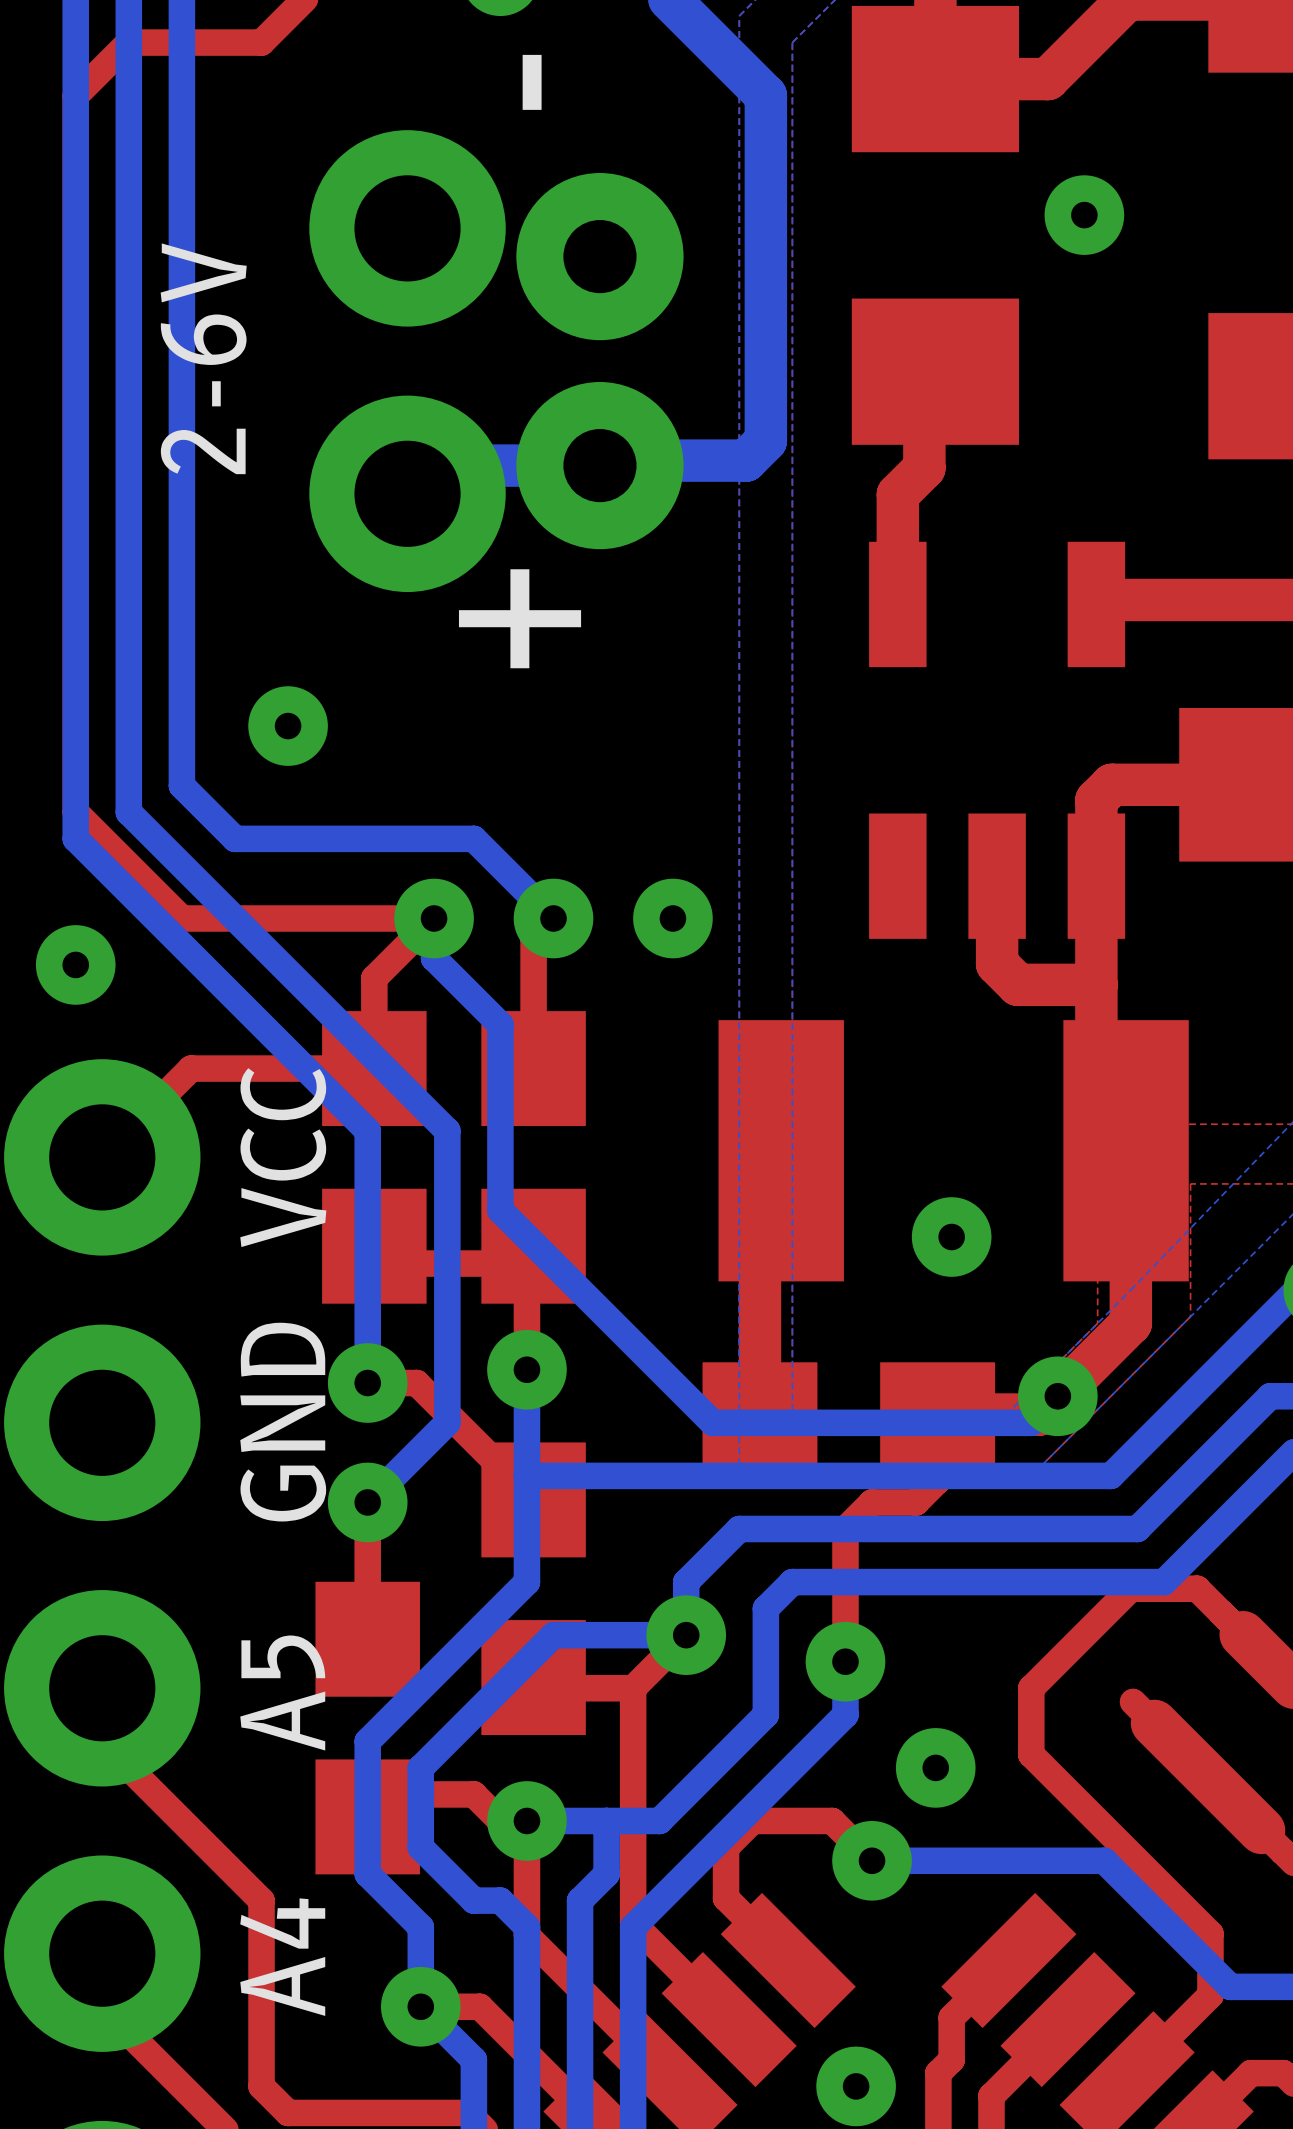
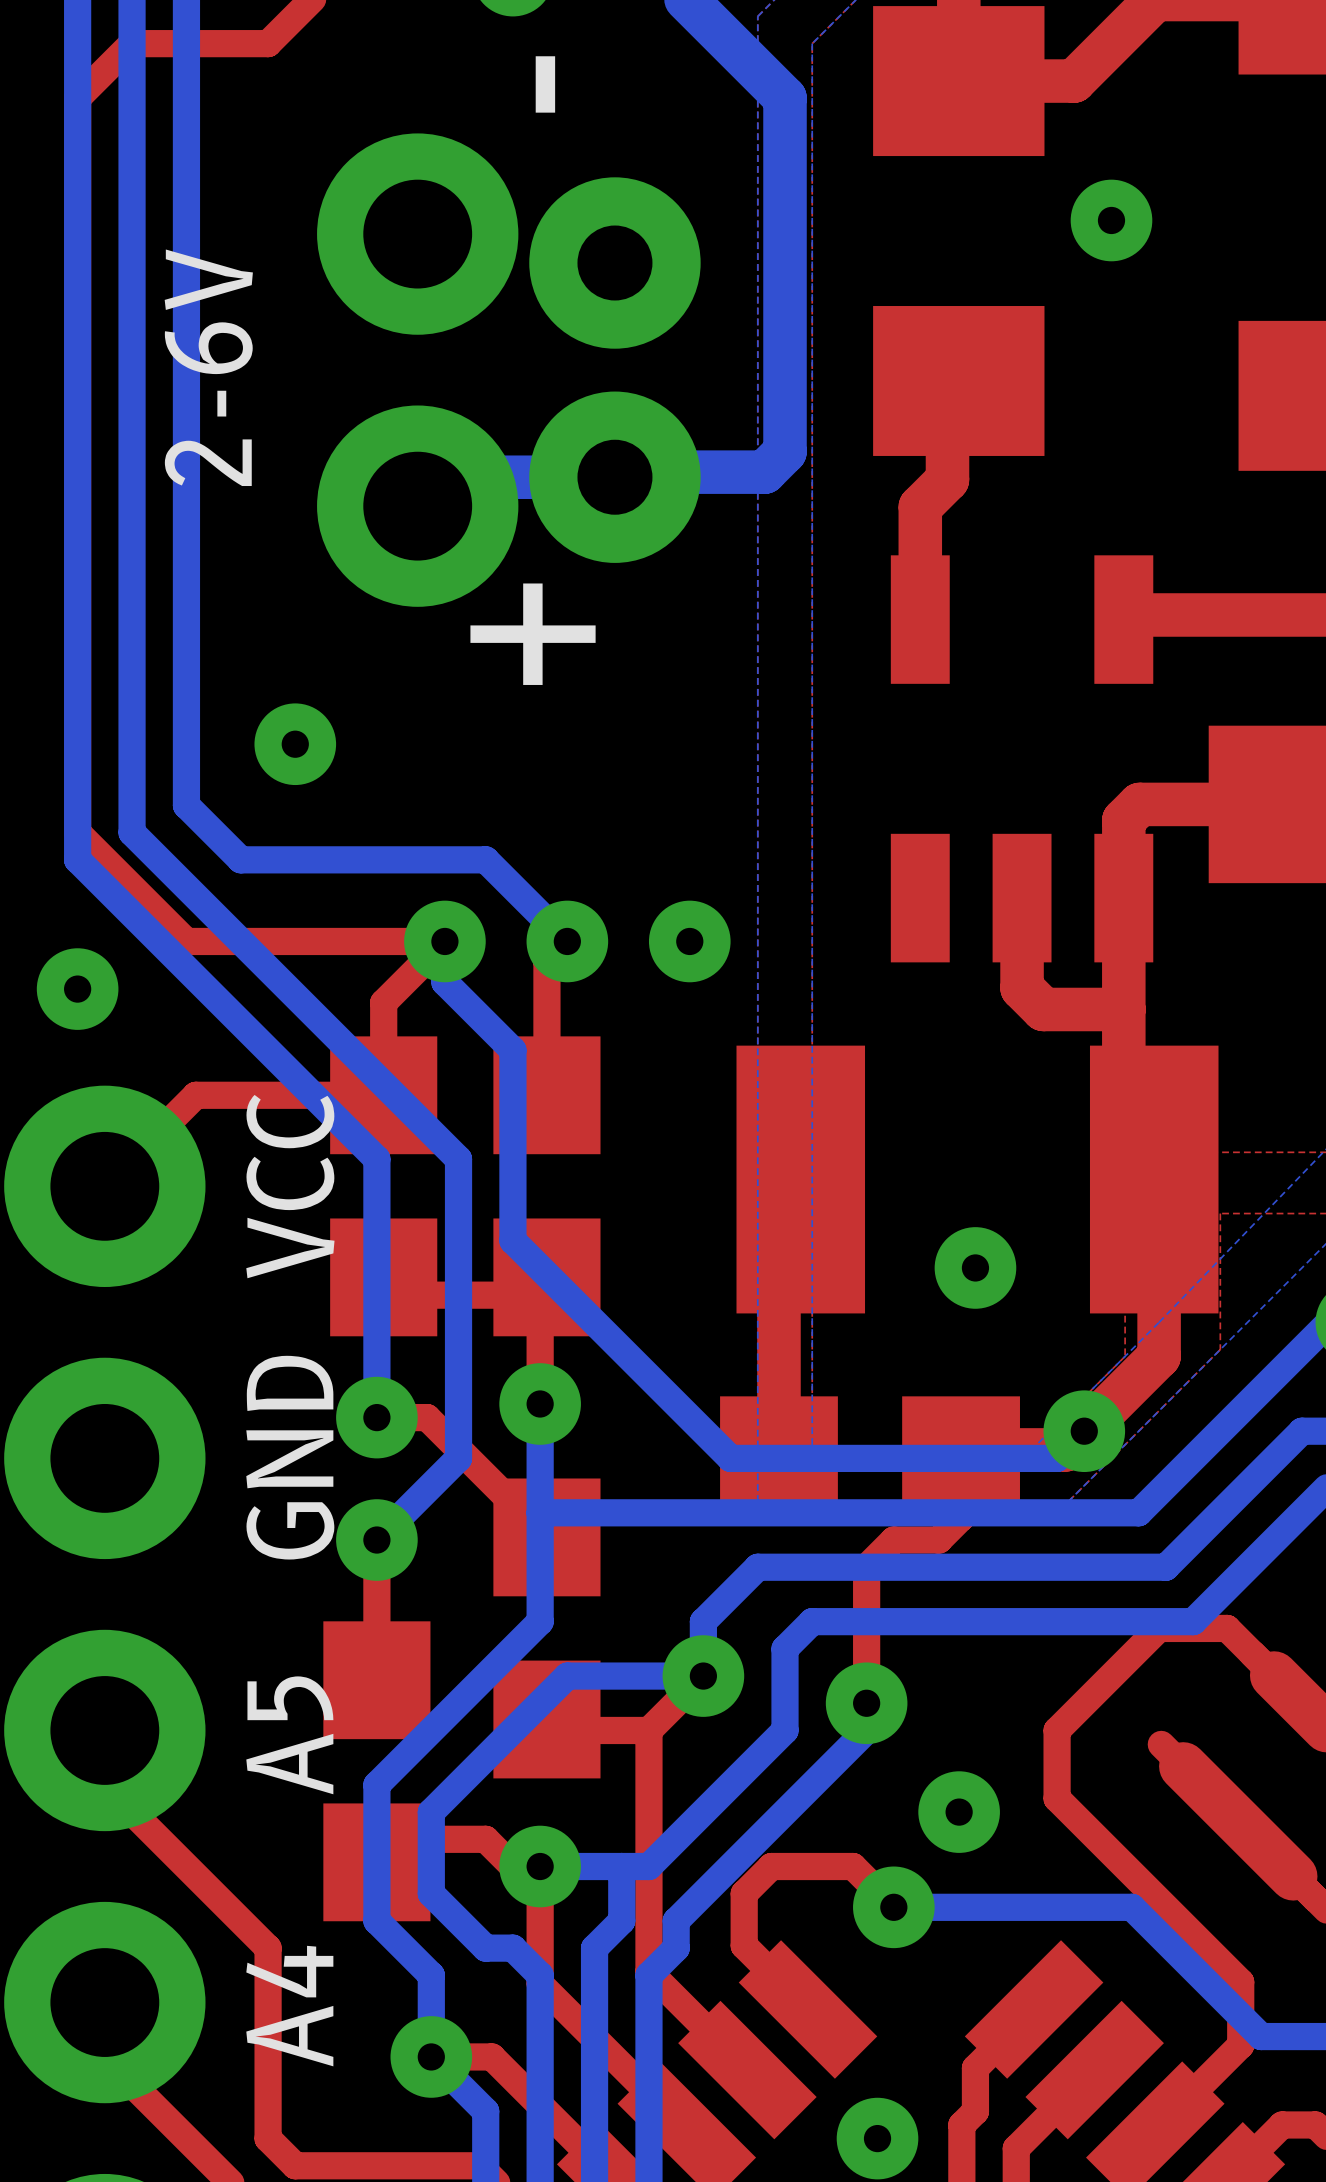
bottom track: (765, 1688) (765, 1714) (659, 1820) (633, 1820) -> (785, 1730) (648, 1866)
bottom track: (845, 1688) (845, 1714) (659, 1900) -> (866, 1730) (676, 1920) (676, 1948)

